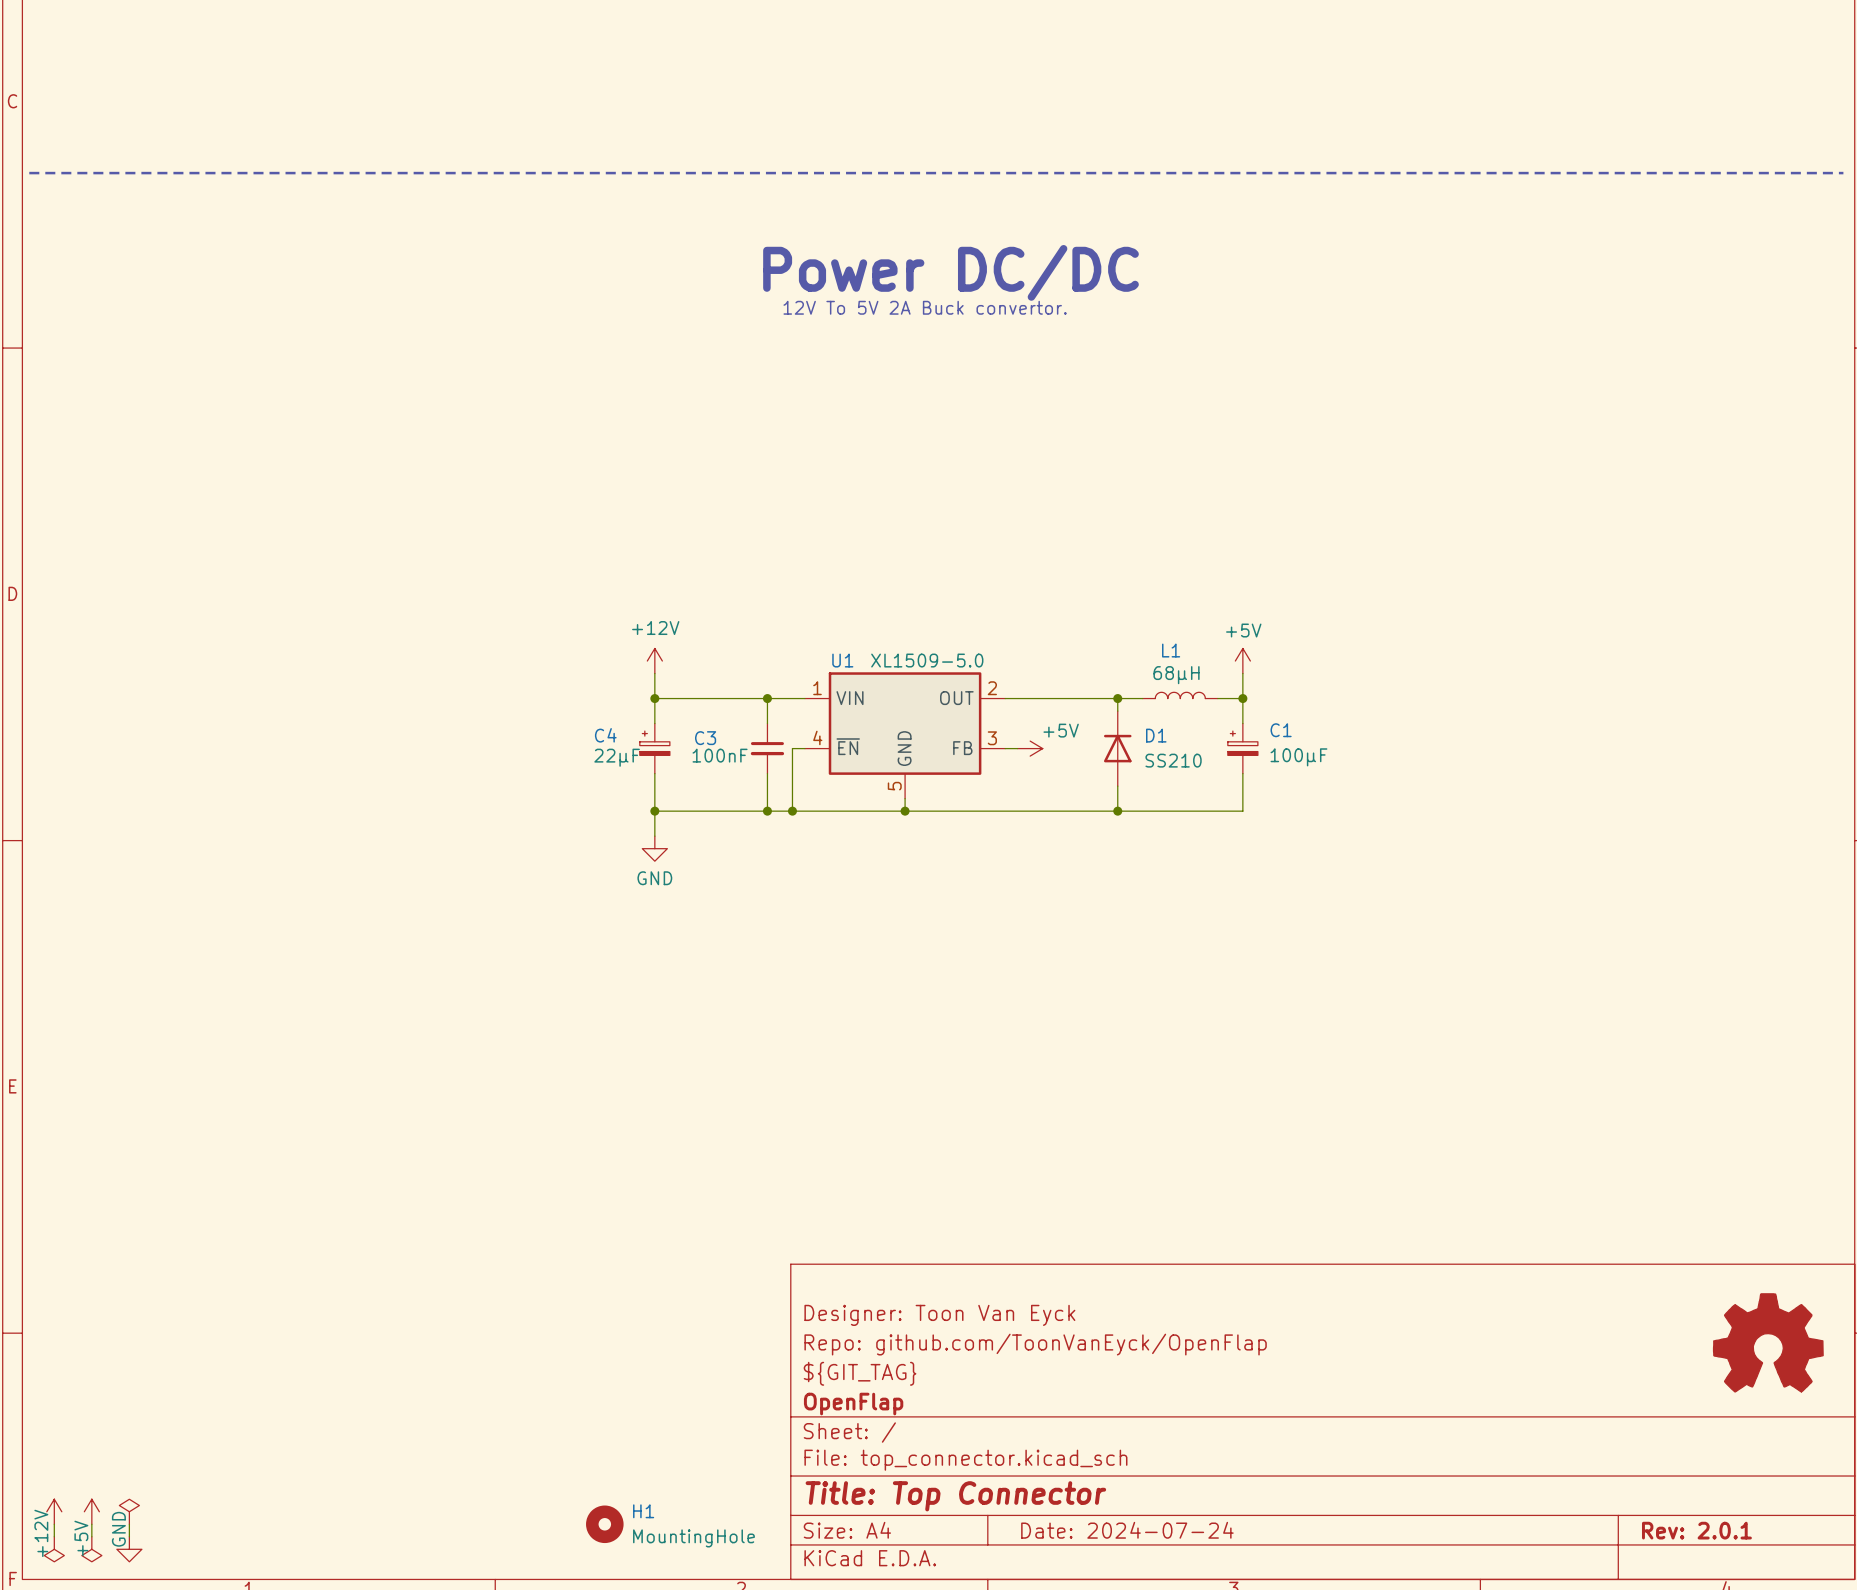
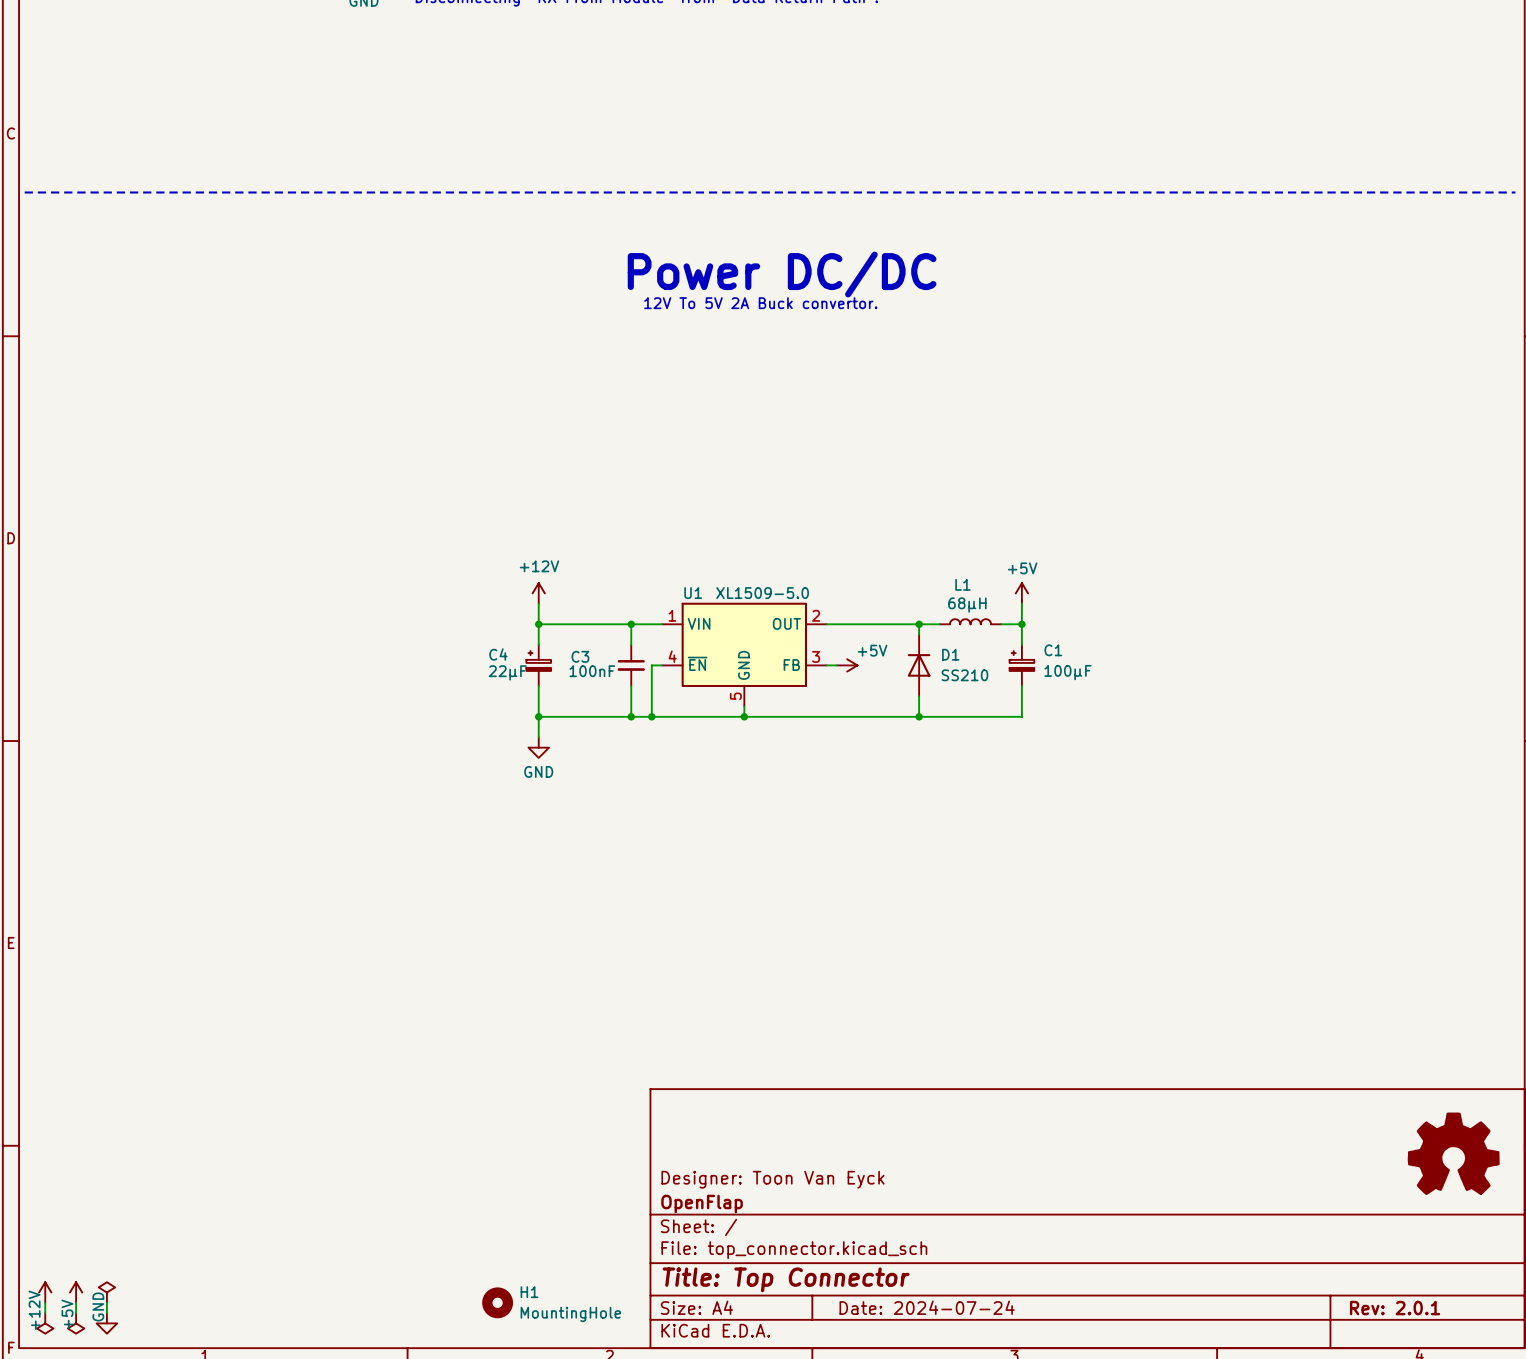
title block: Designer: Toon Van Eyck (939, 1315) -> none
title block: Repo: github.com/ToonVanEyck/OpenFlap (1035, 1344) -> none
title block: ${GIT_TAG} (860, 1373) -> Designer: Toon Van Eyck (772, 1179)

